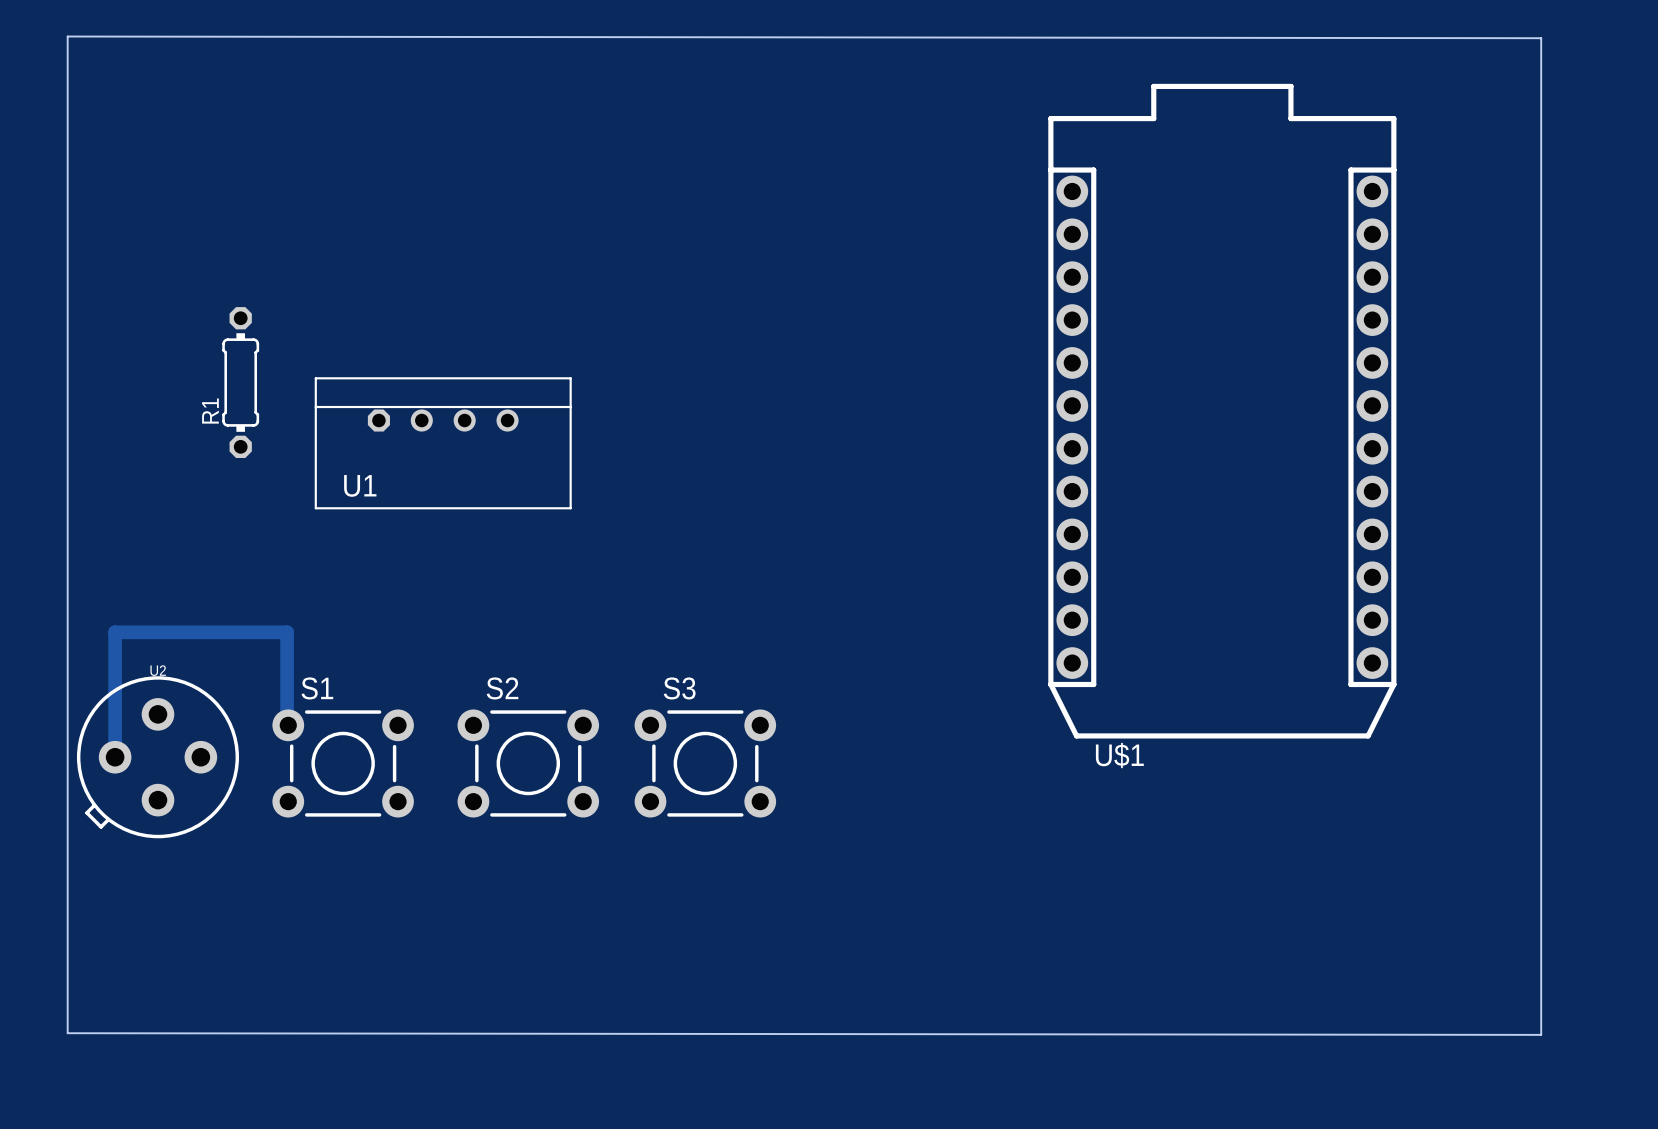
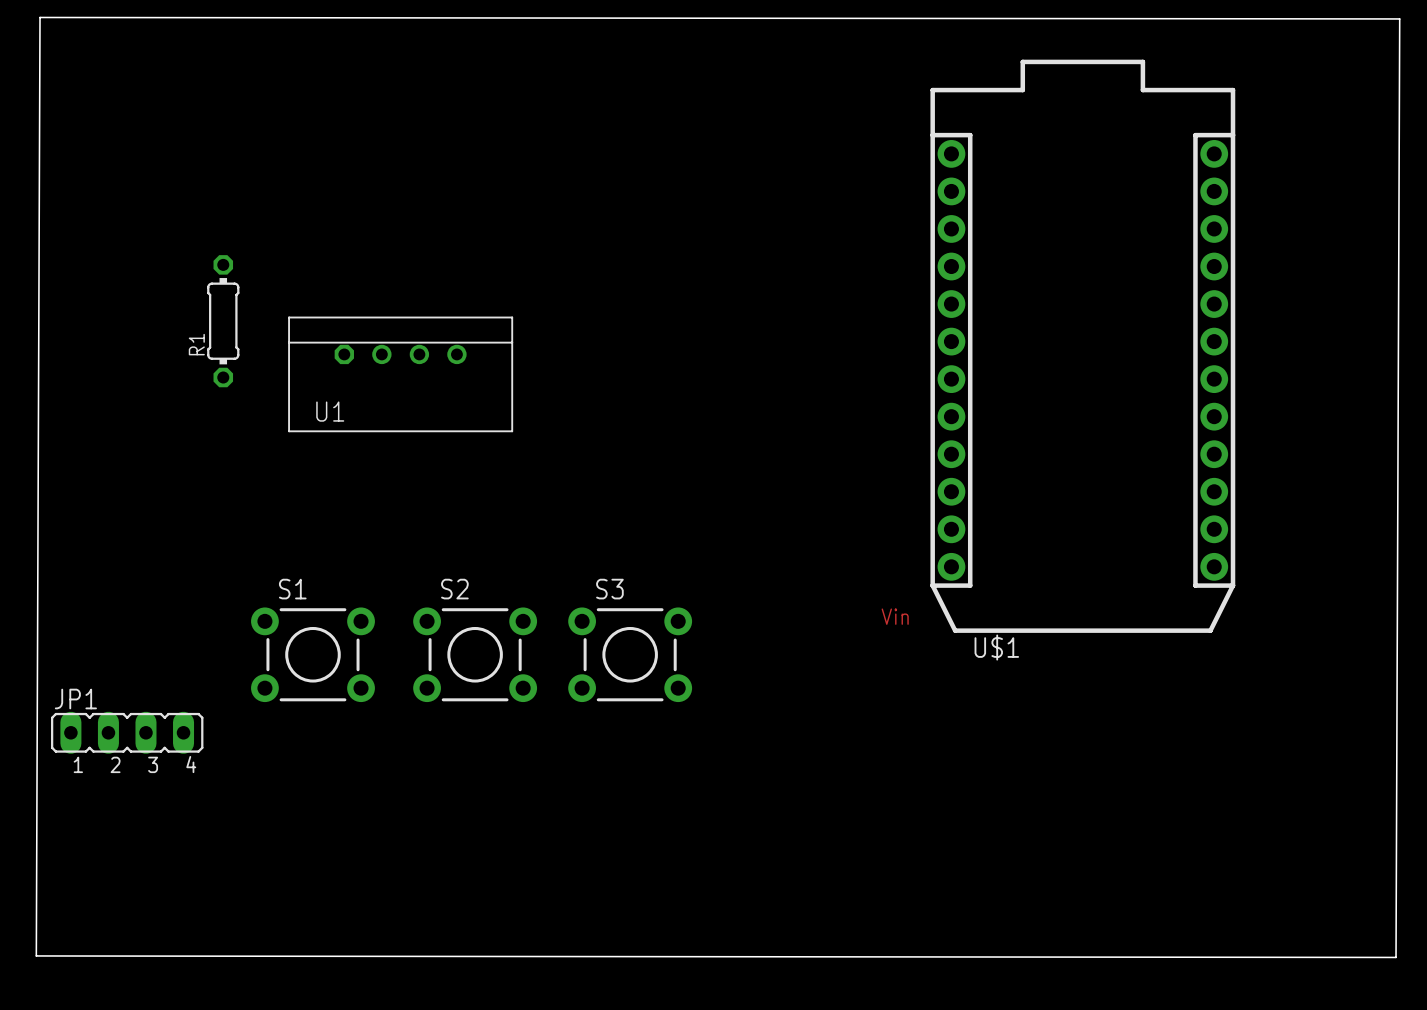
board edge: (67, 36) (1541, 38) (1541, 1034) (67, 1033) (67, 36) -> (40, 17) (36, 955) (1396, 957) (1399, 18) (40, 17)
text: none -> Vin (895, 616)
track: (287, 725) (287, 632) (115, 632) (115, 757) -> none
U2: (157, 757) -> none
JP1: none -> (127, 732)

